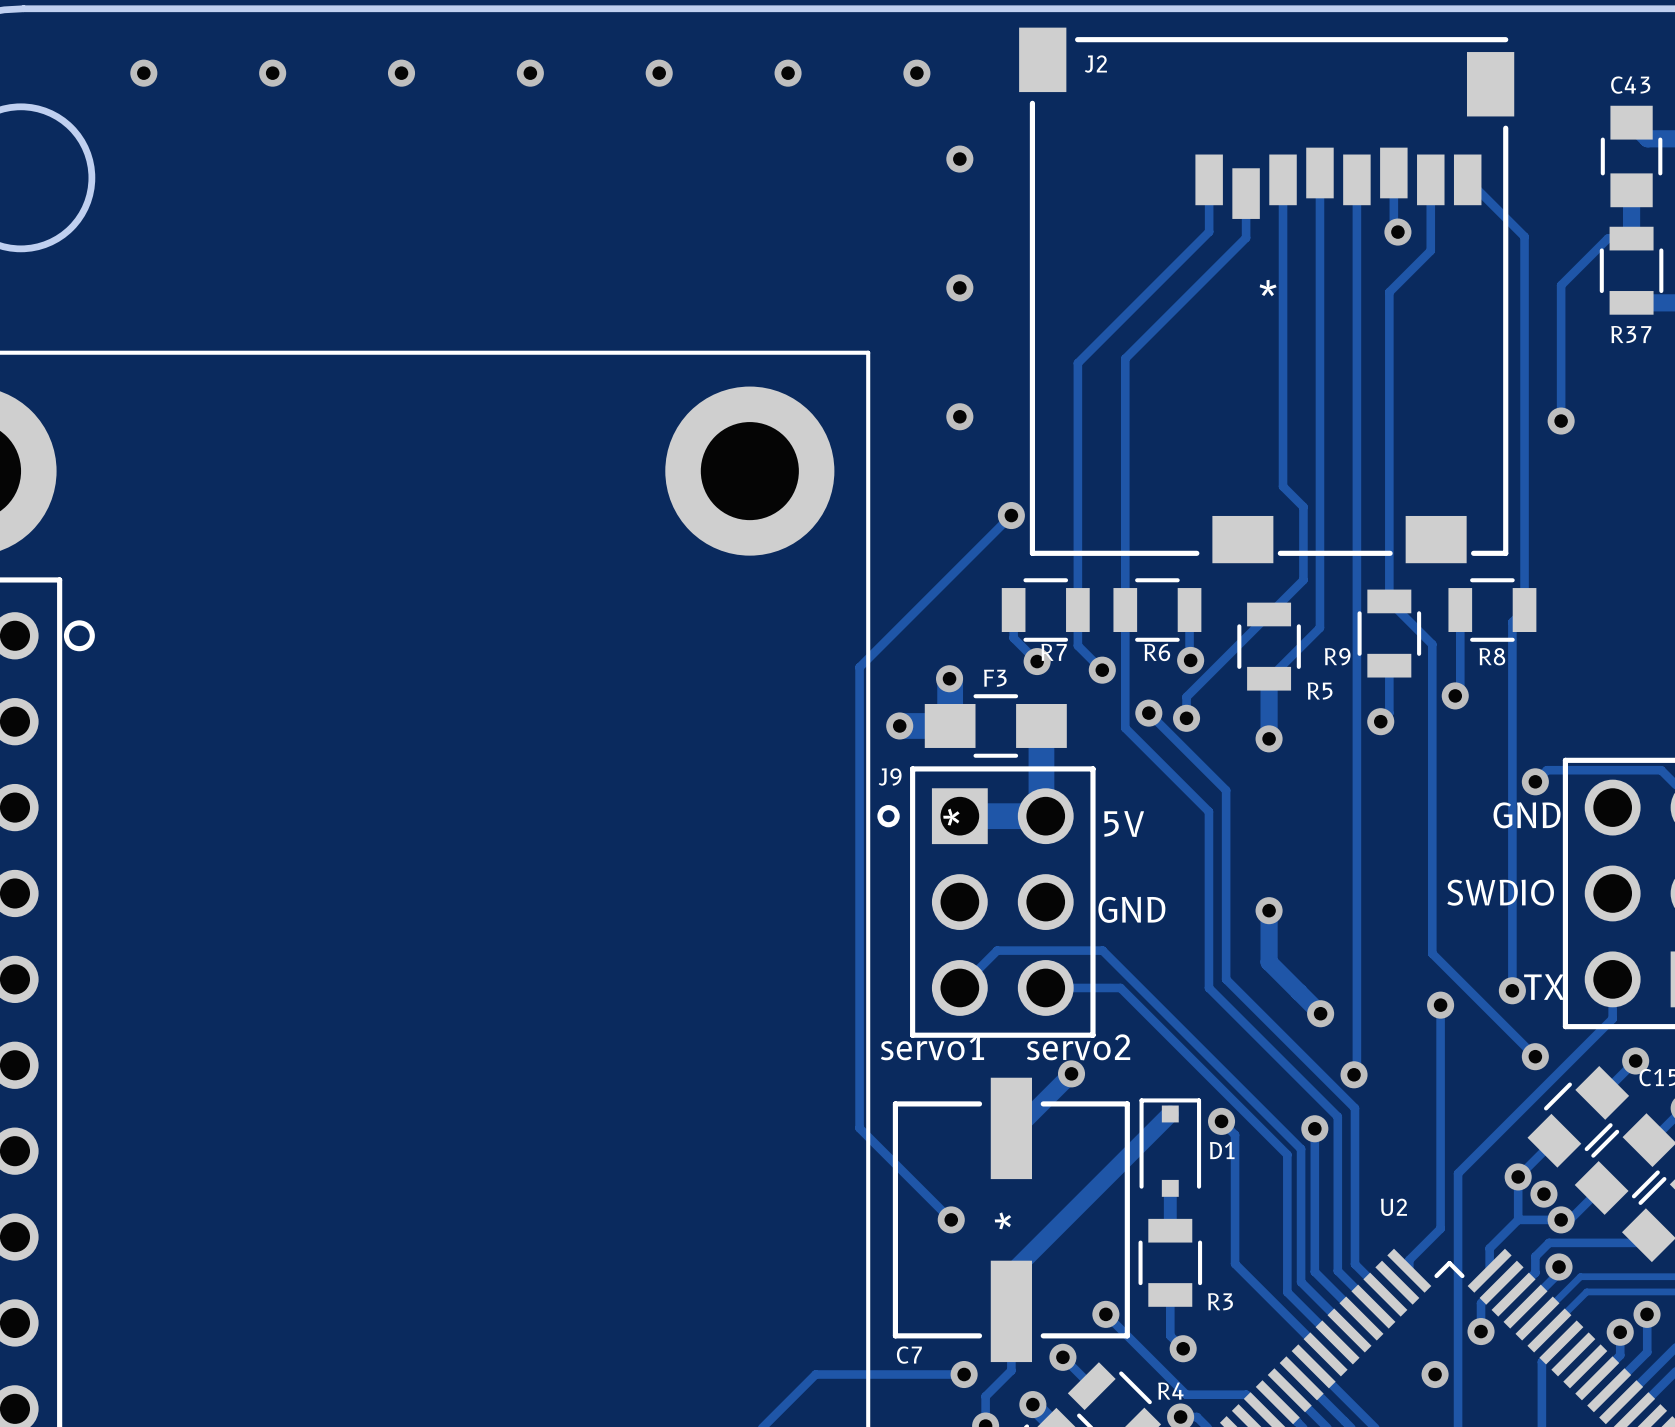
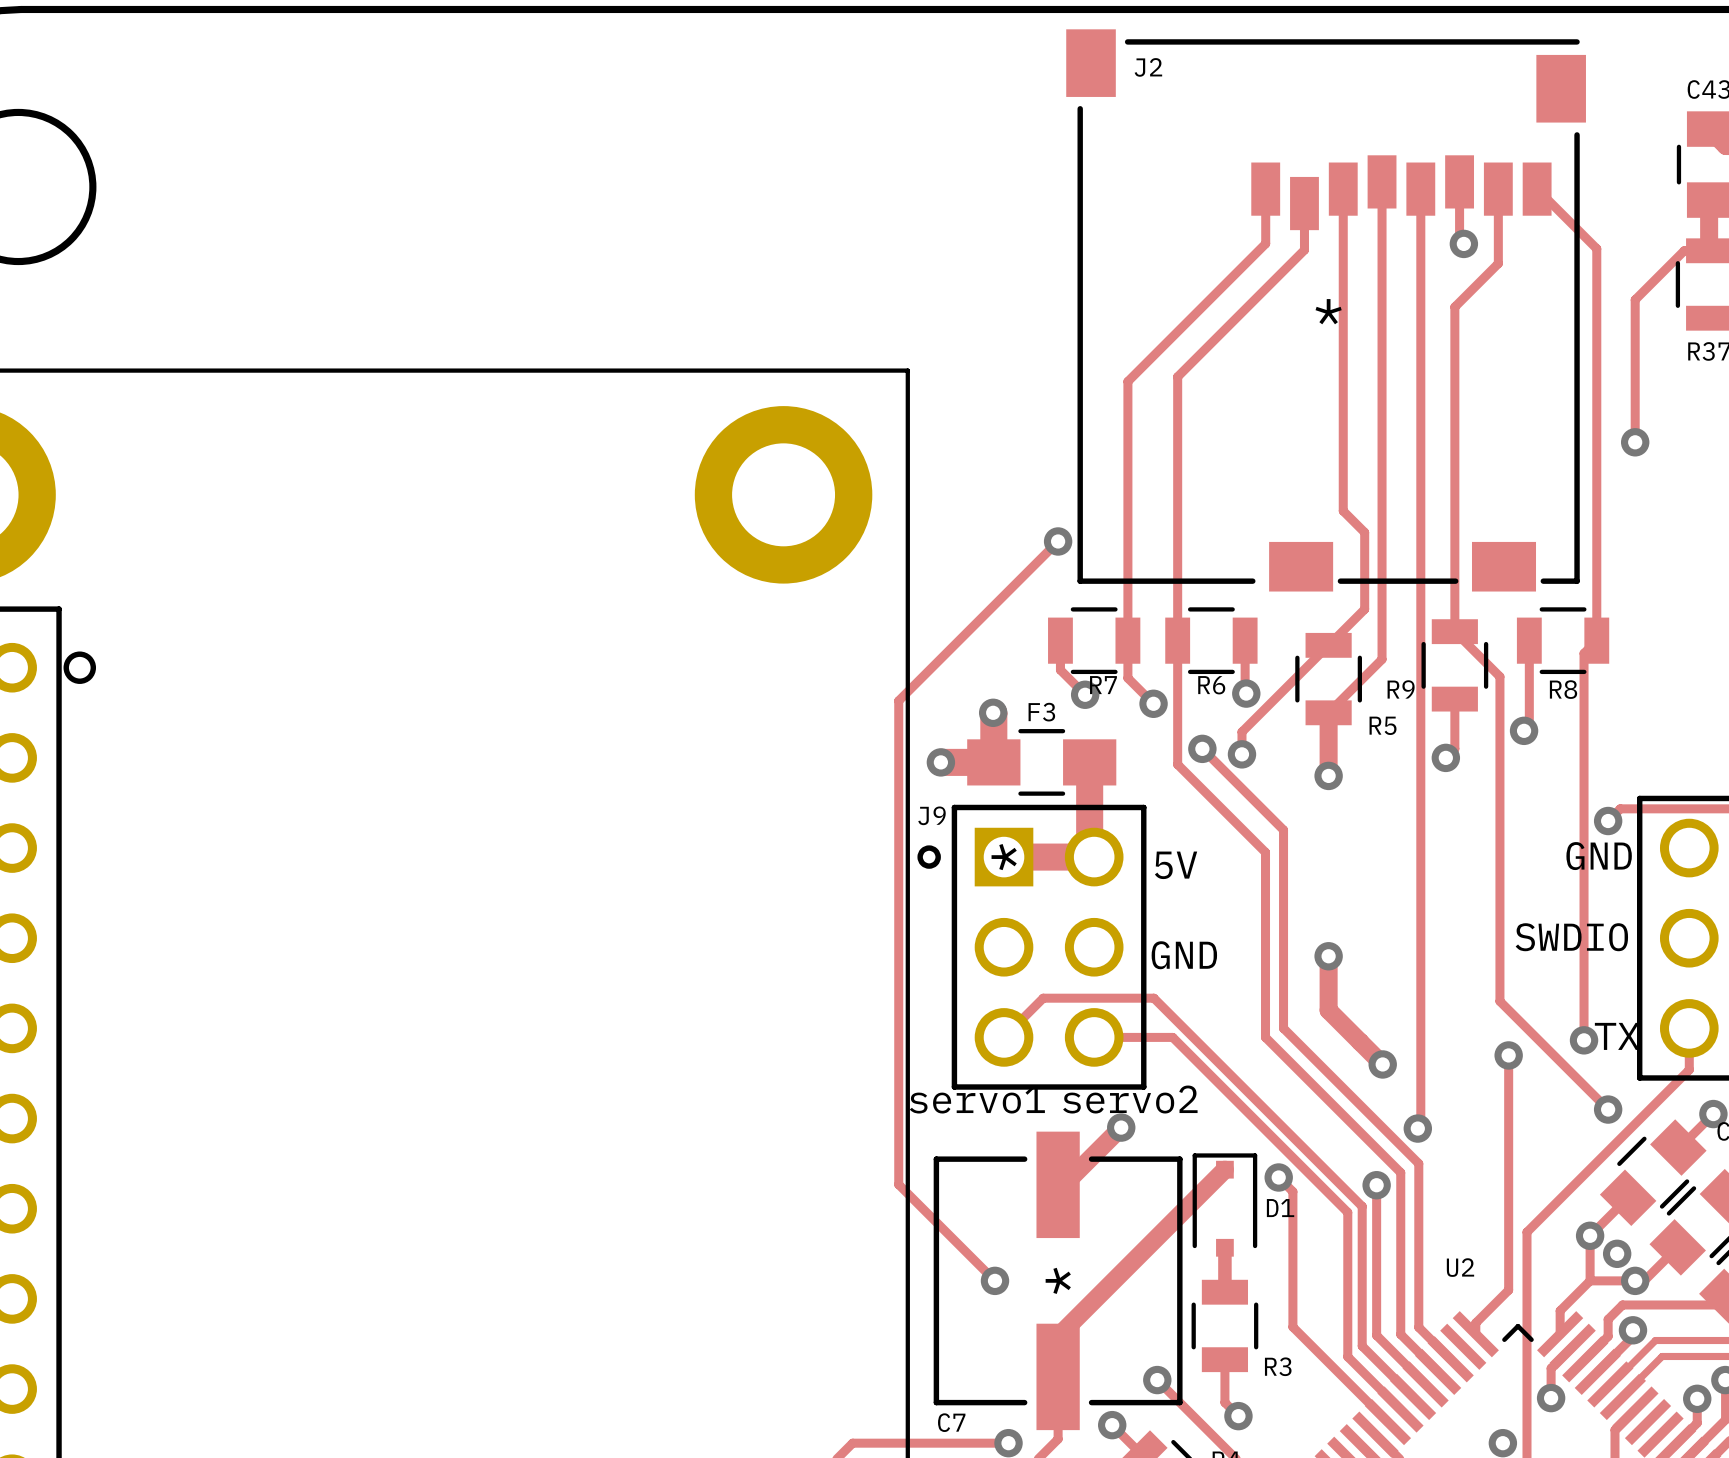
via: (143, 73) -> none
via: (272, 73) -> none
via: (401, 73) -> none
via: (530, 73) -> none
via: (659, 73) -> none
via: (788, 73) -> none
via: (916, 73) -> none
via: (959, 159) -> none
via: (959, 287) -> none
via: (959, 416) -> none

